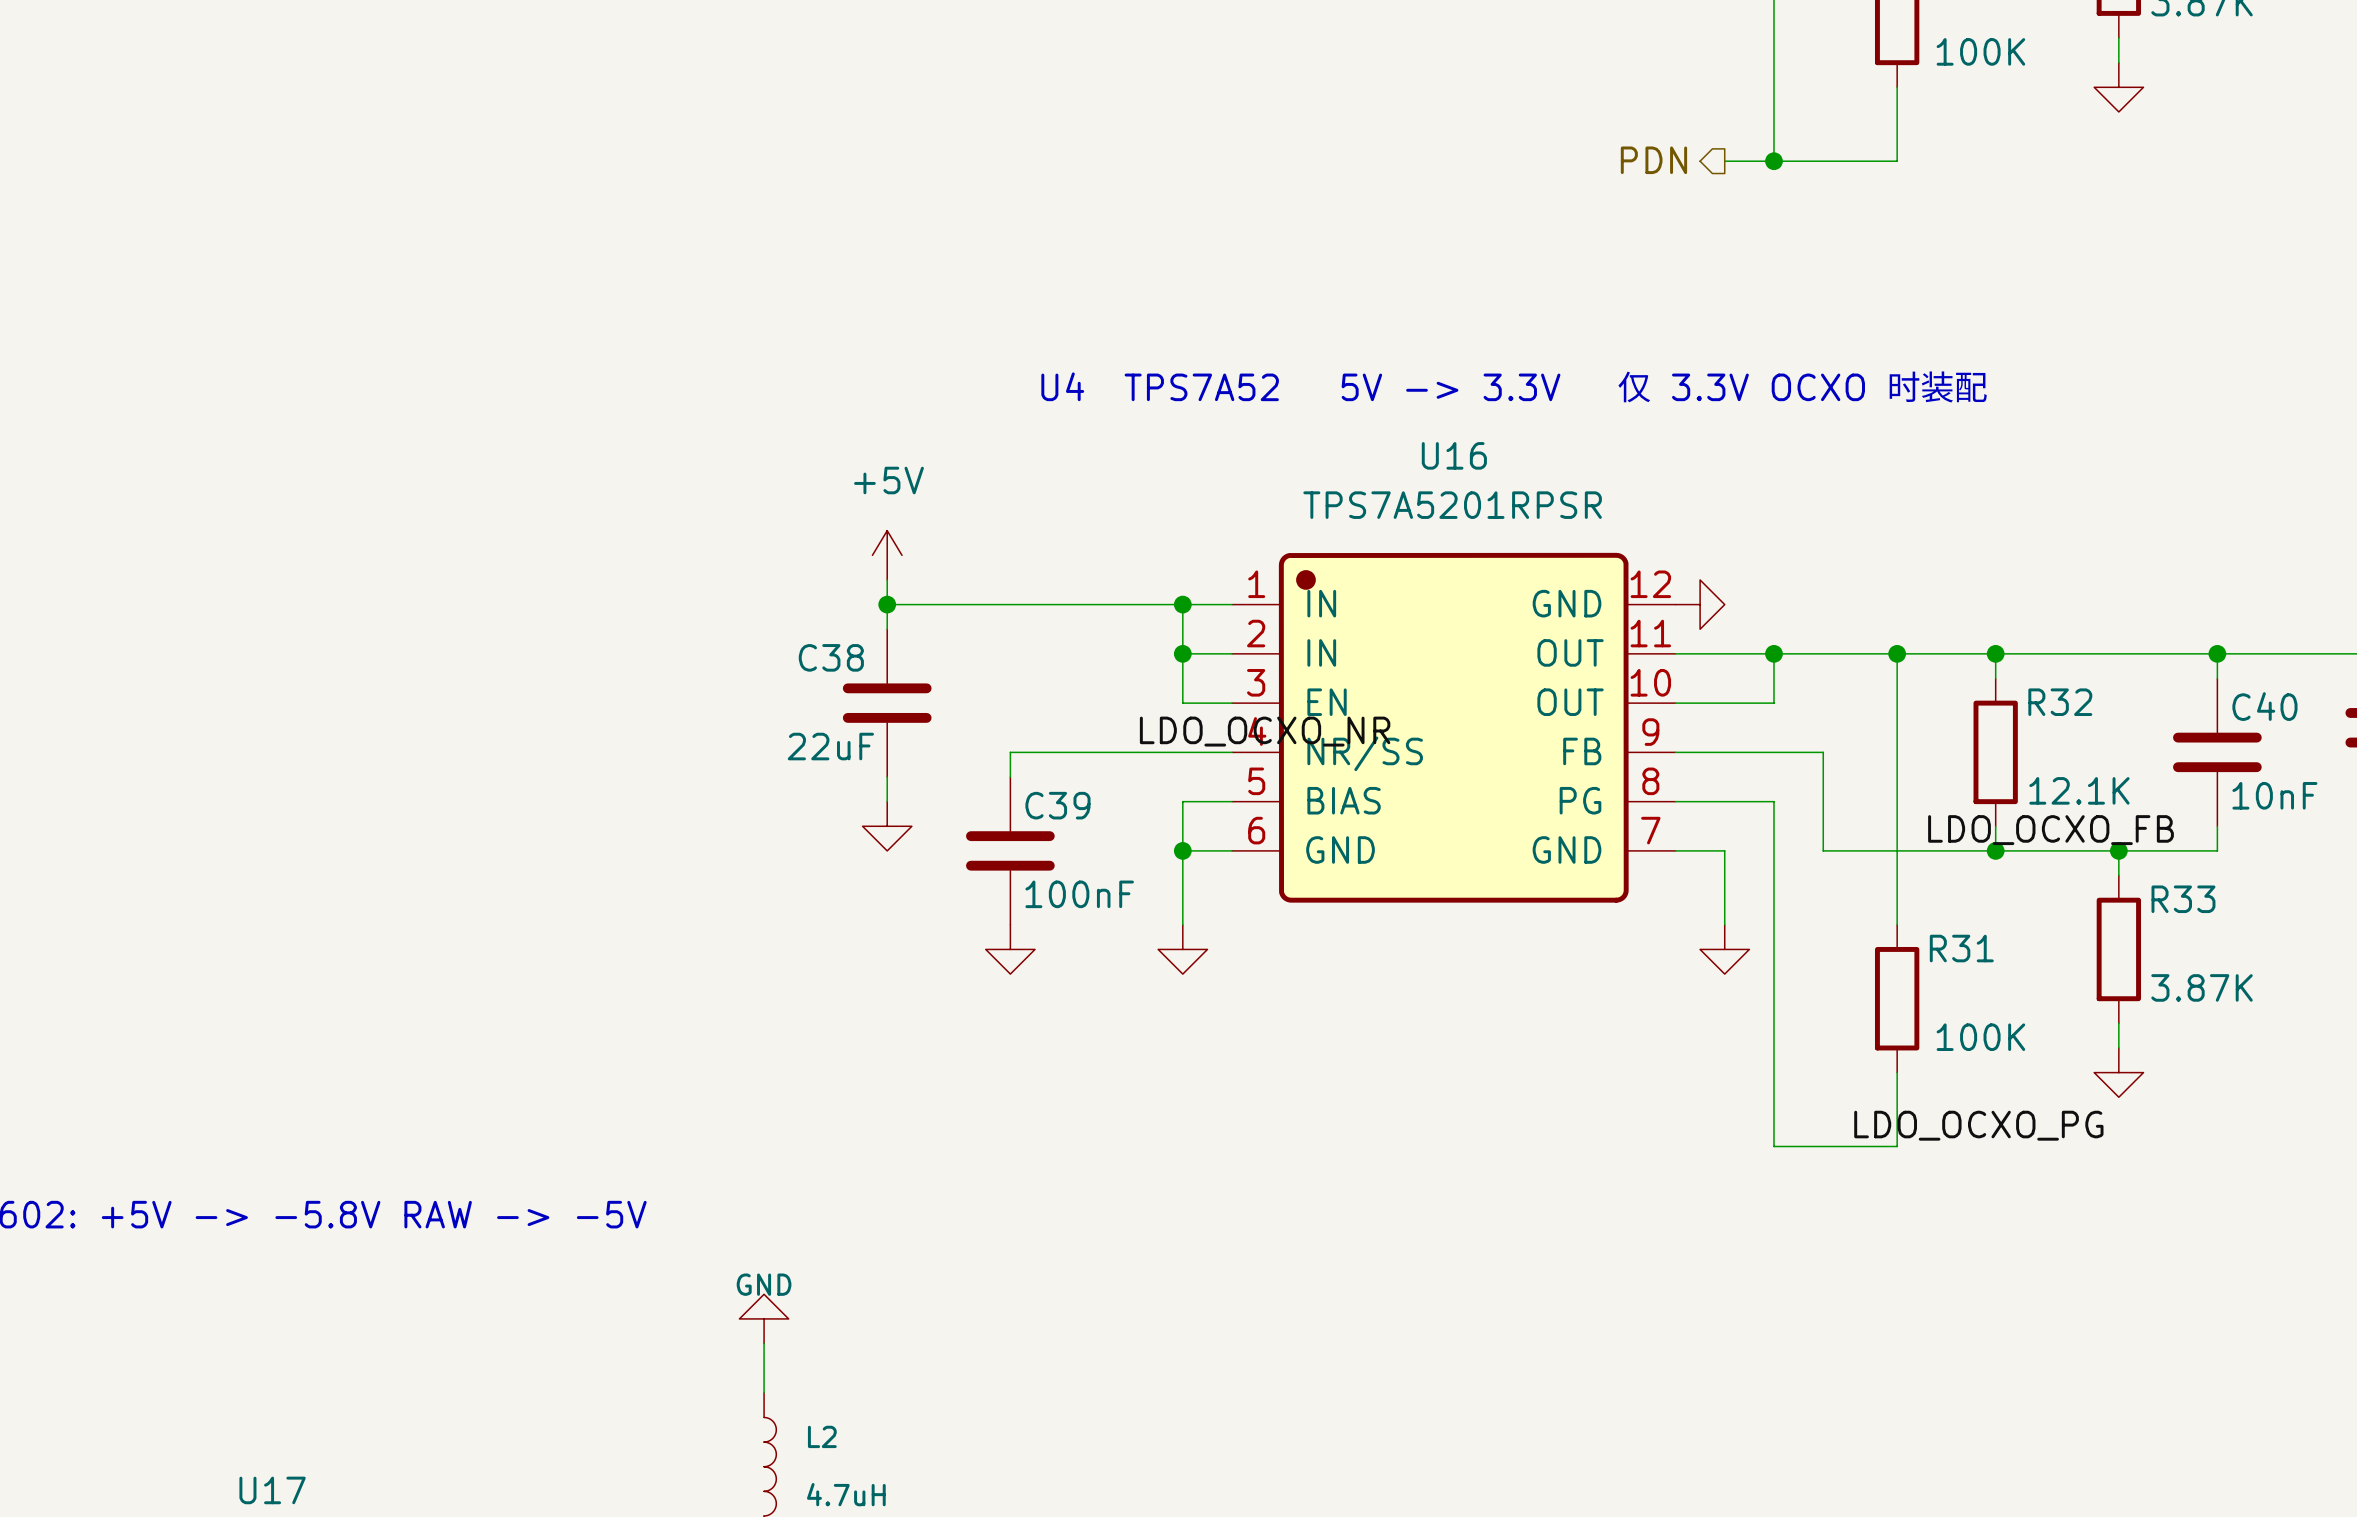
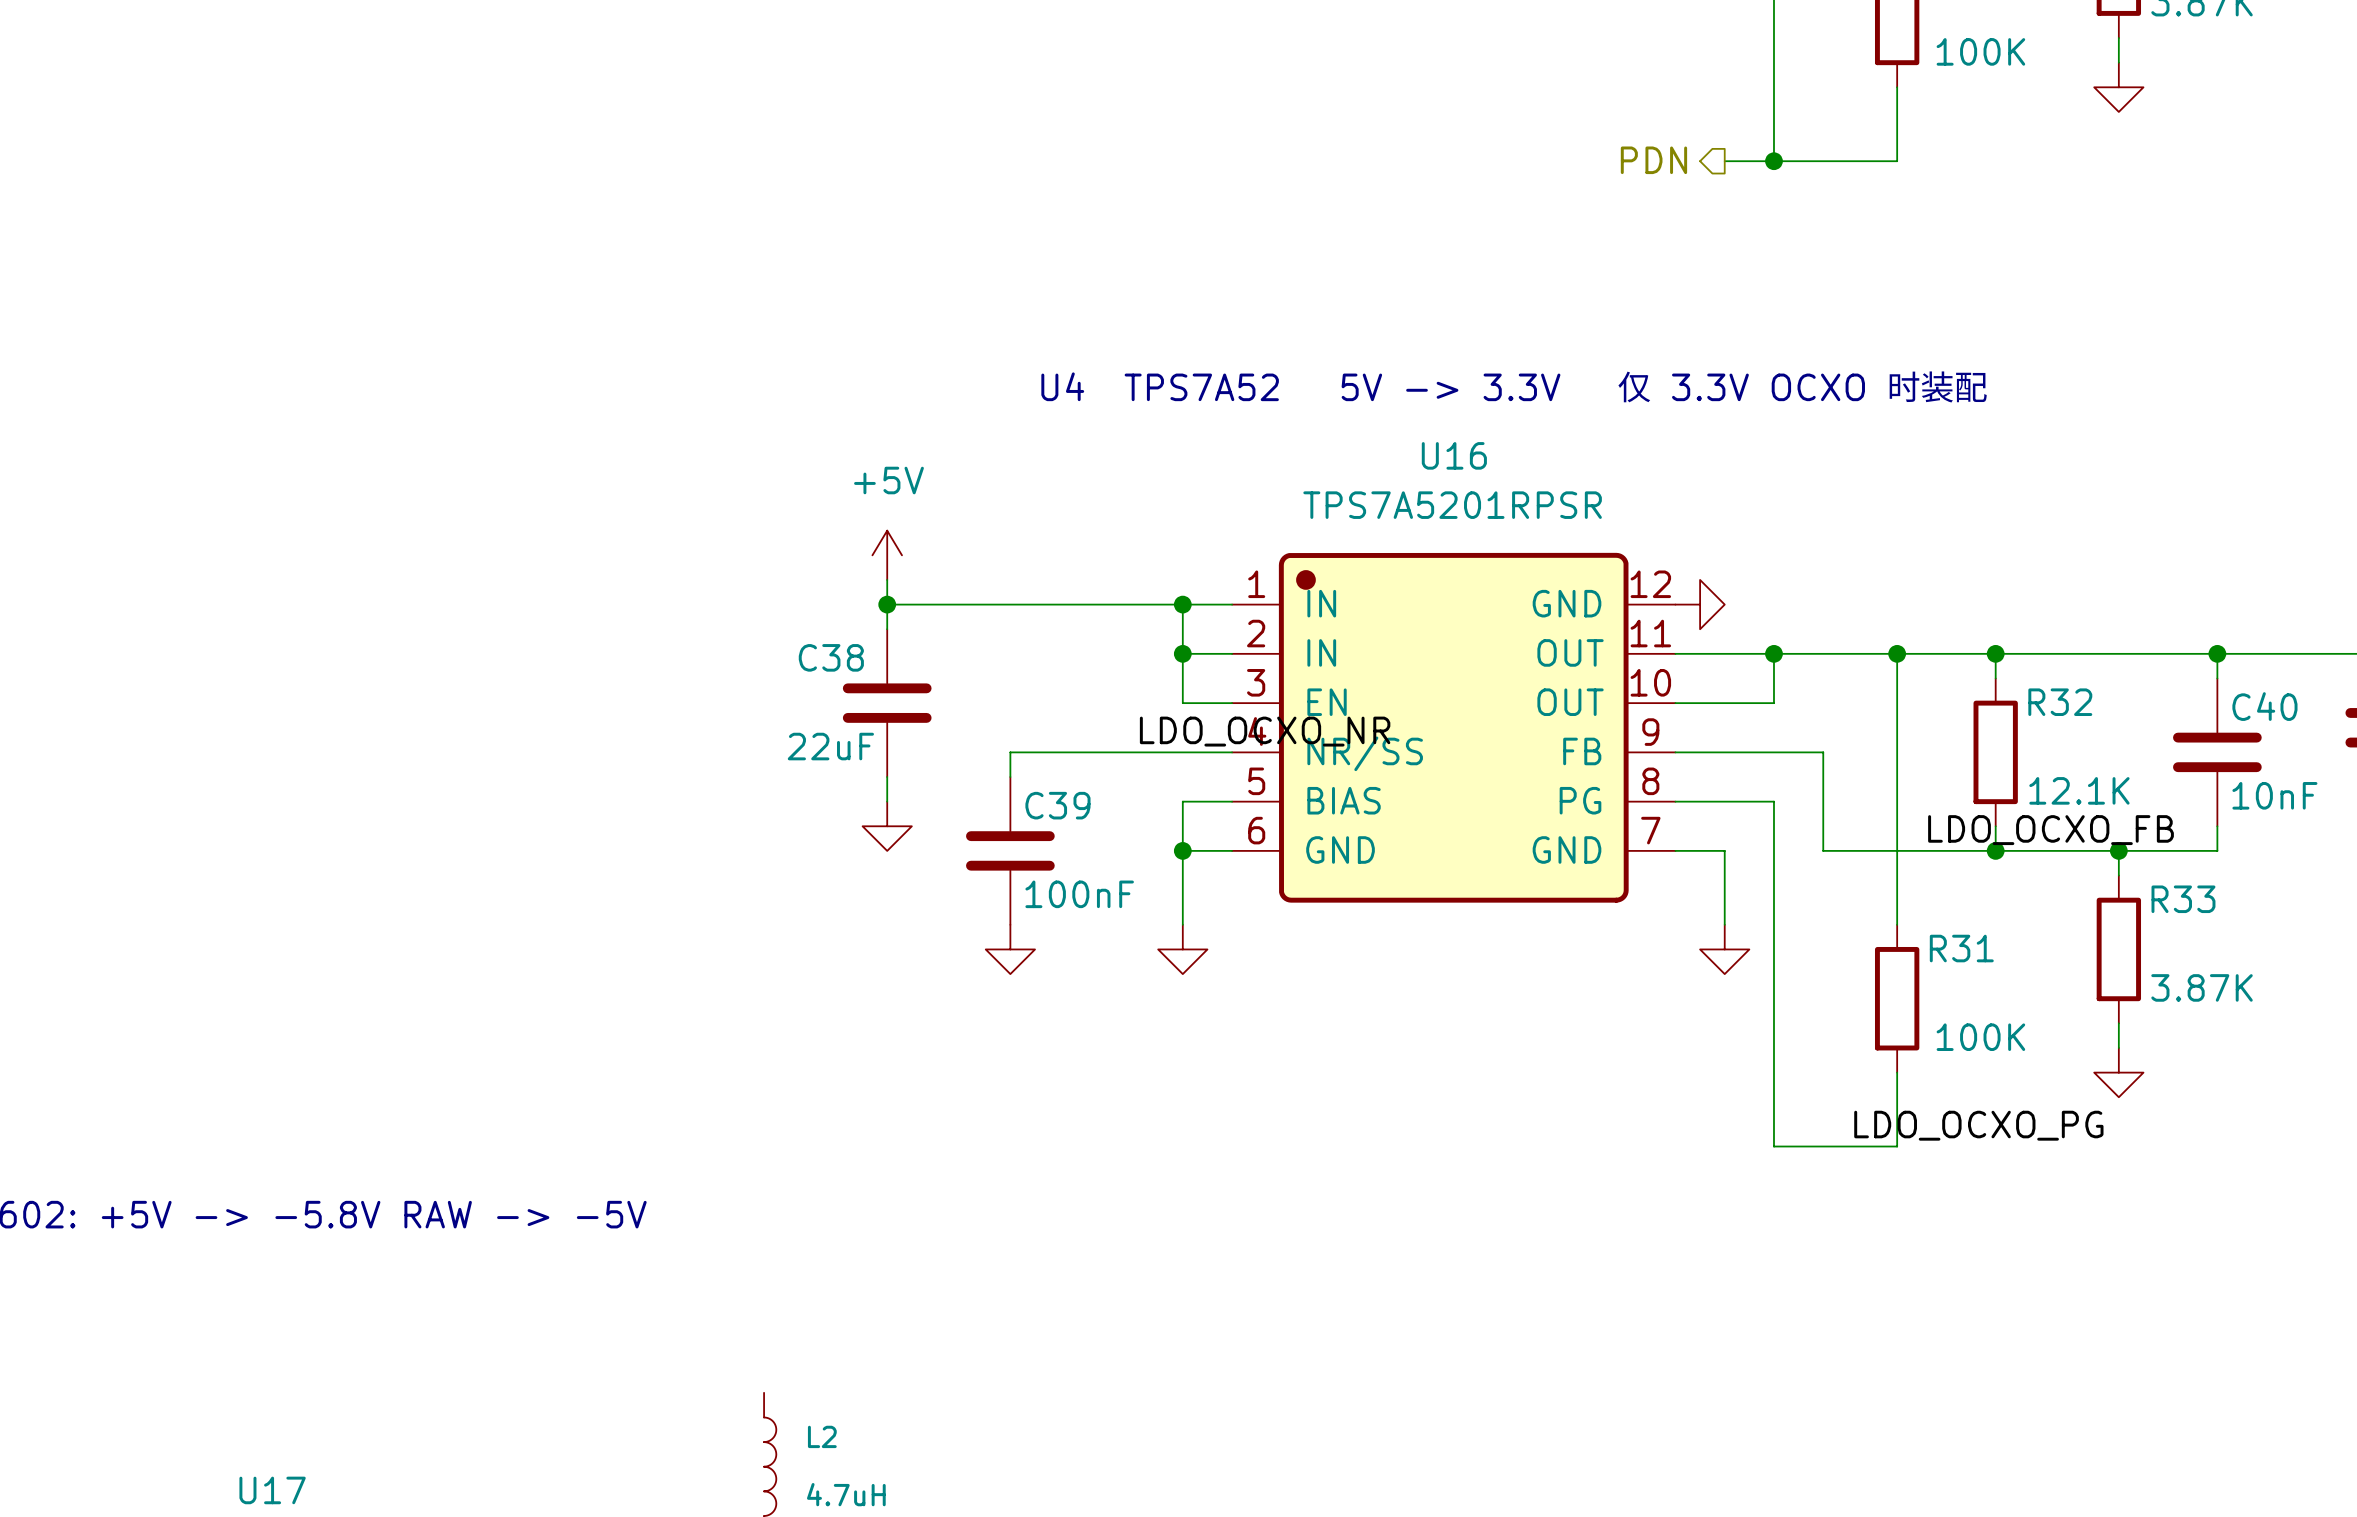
power symbol: GND (764, 1318) -> none
wire: (764, 1343) (764, 1392) -> none

